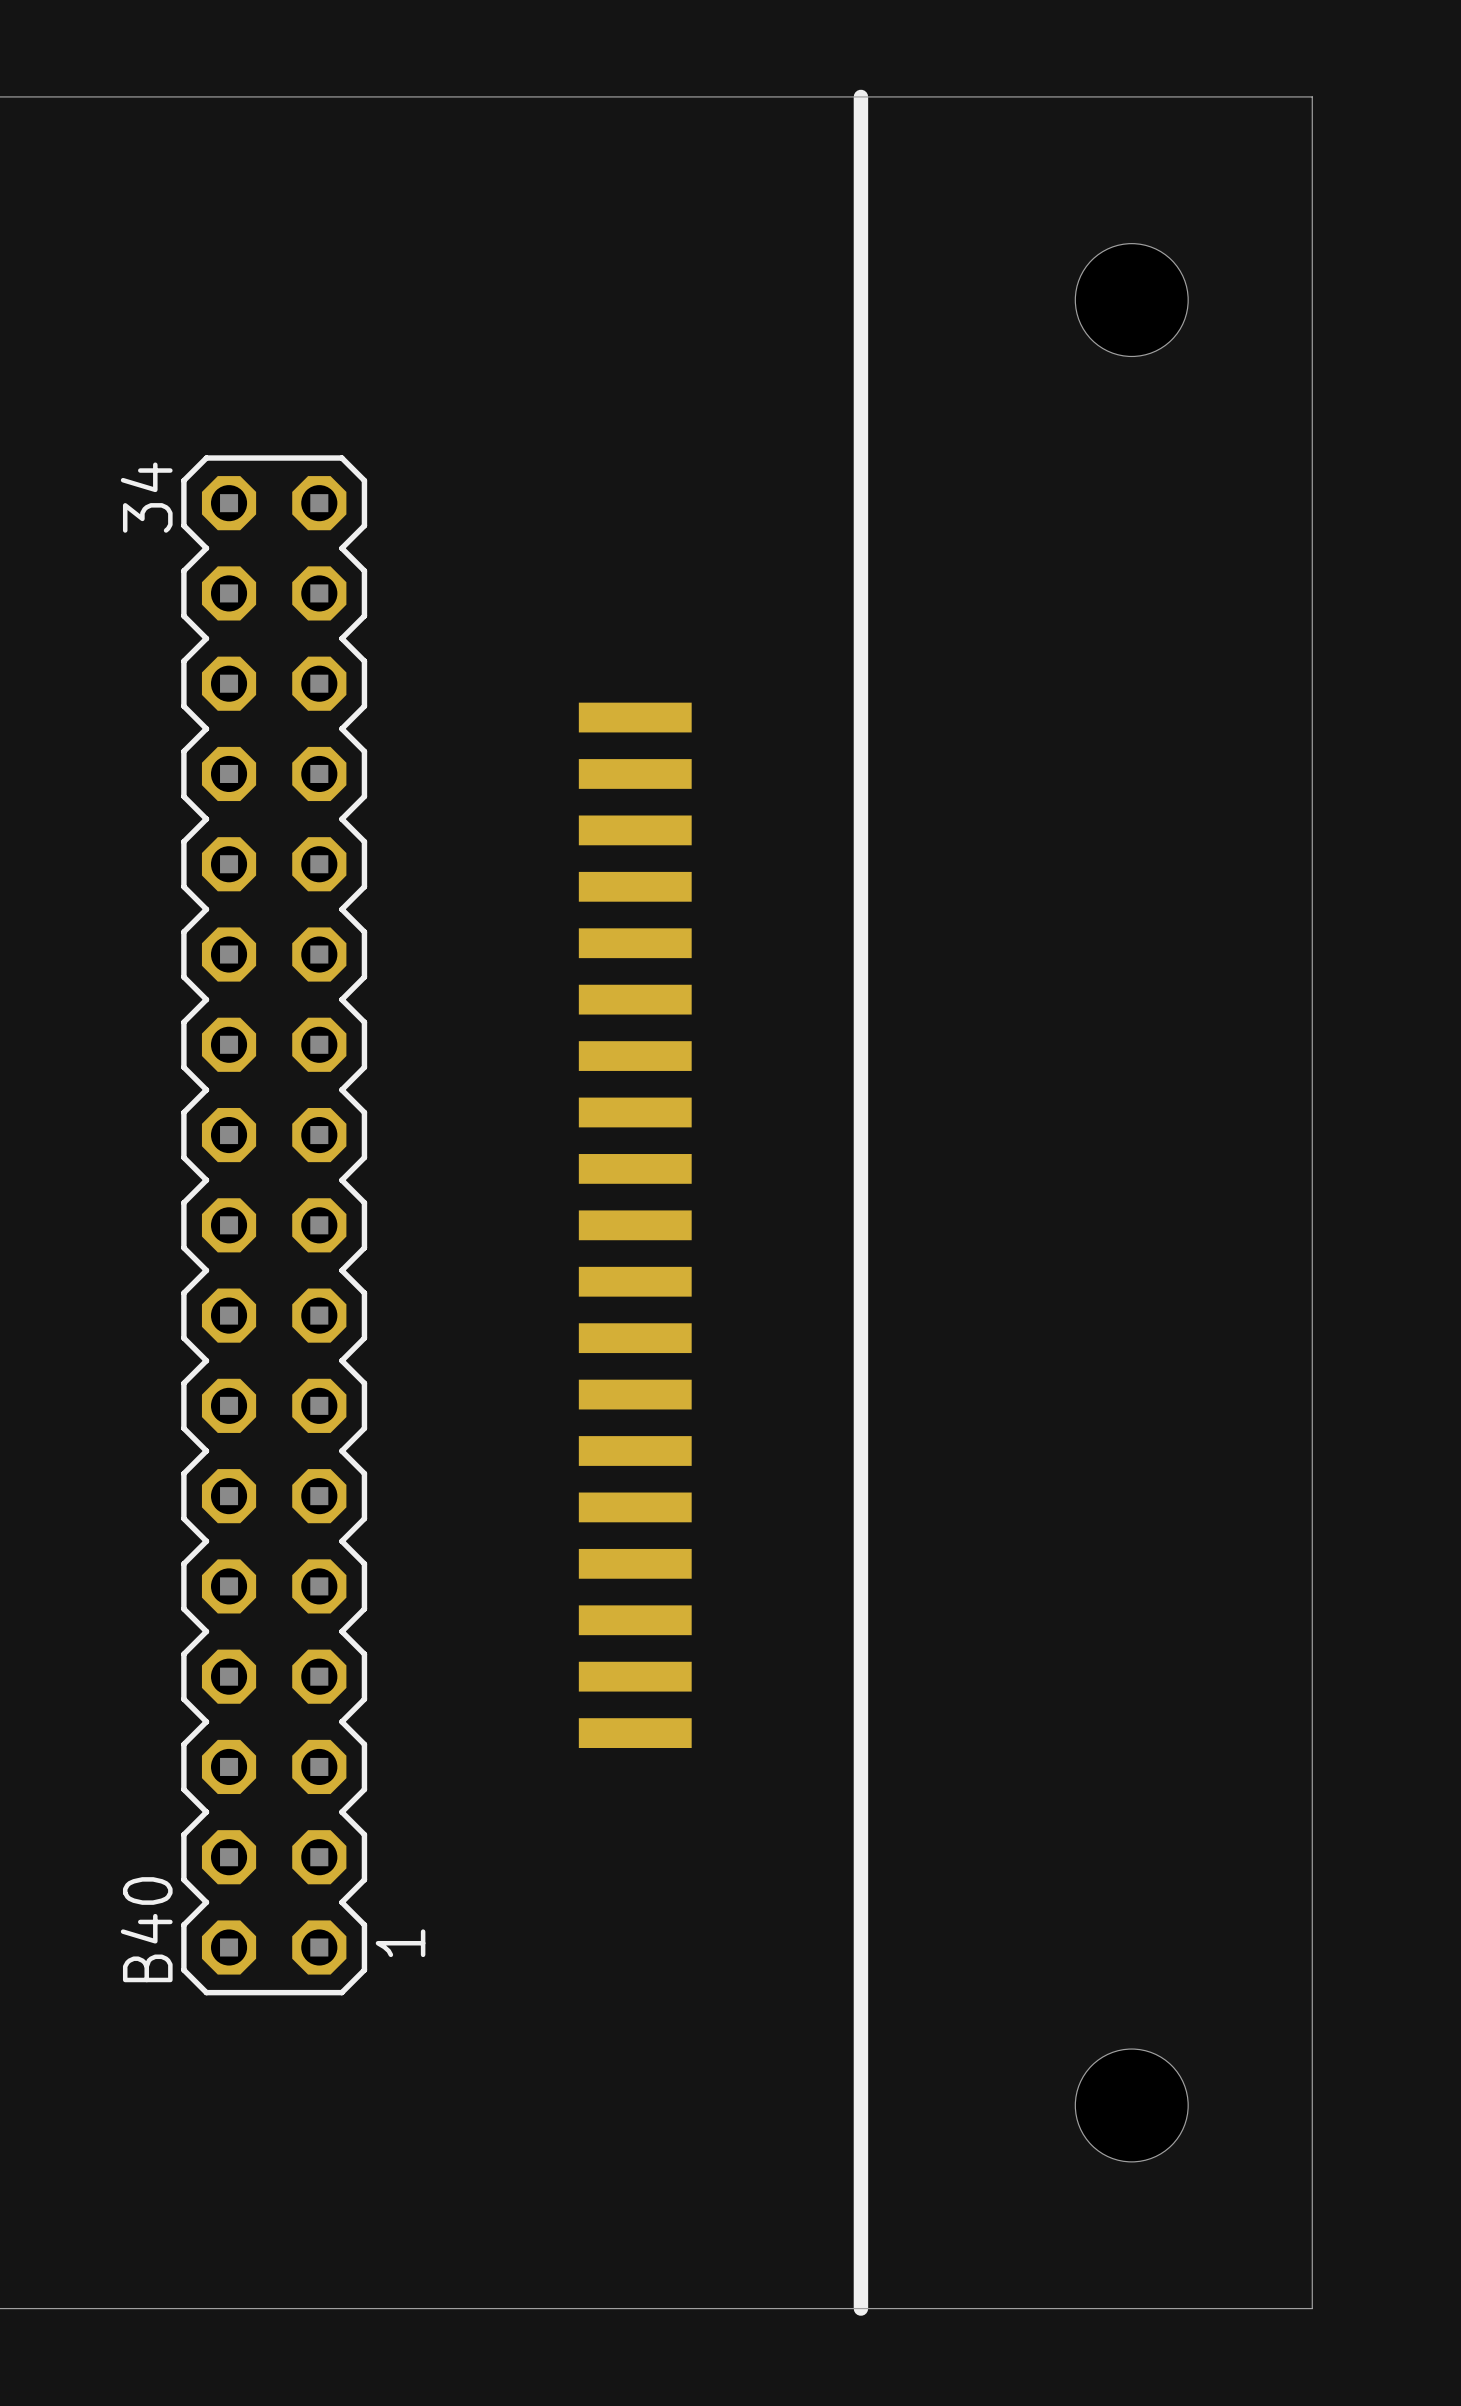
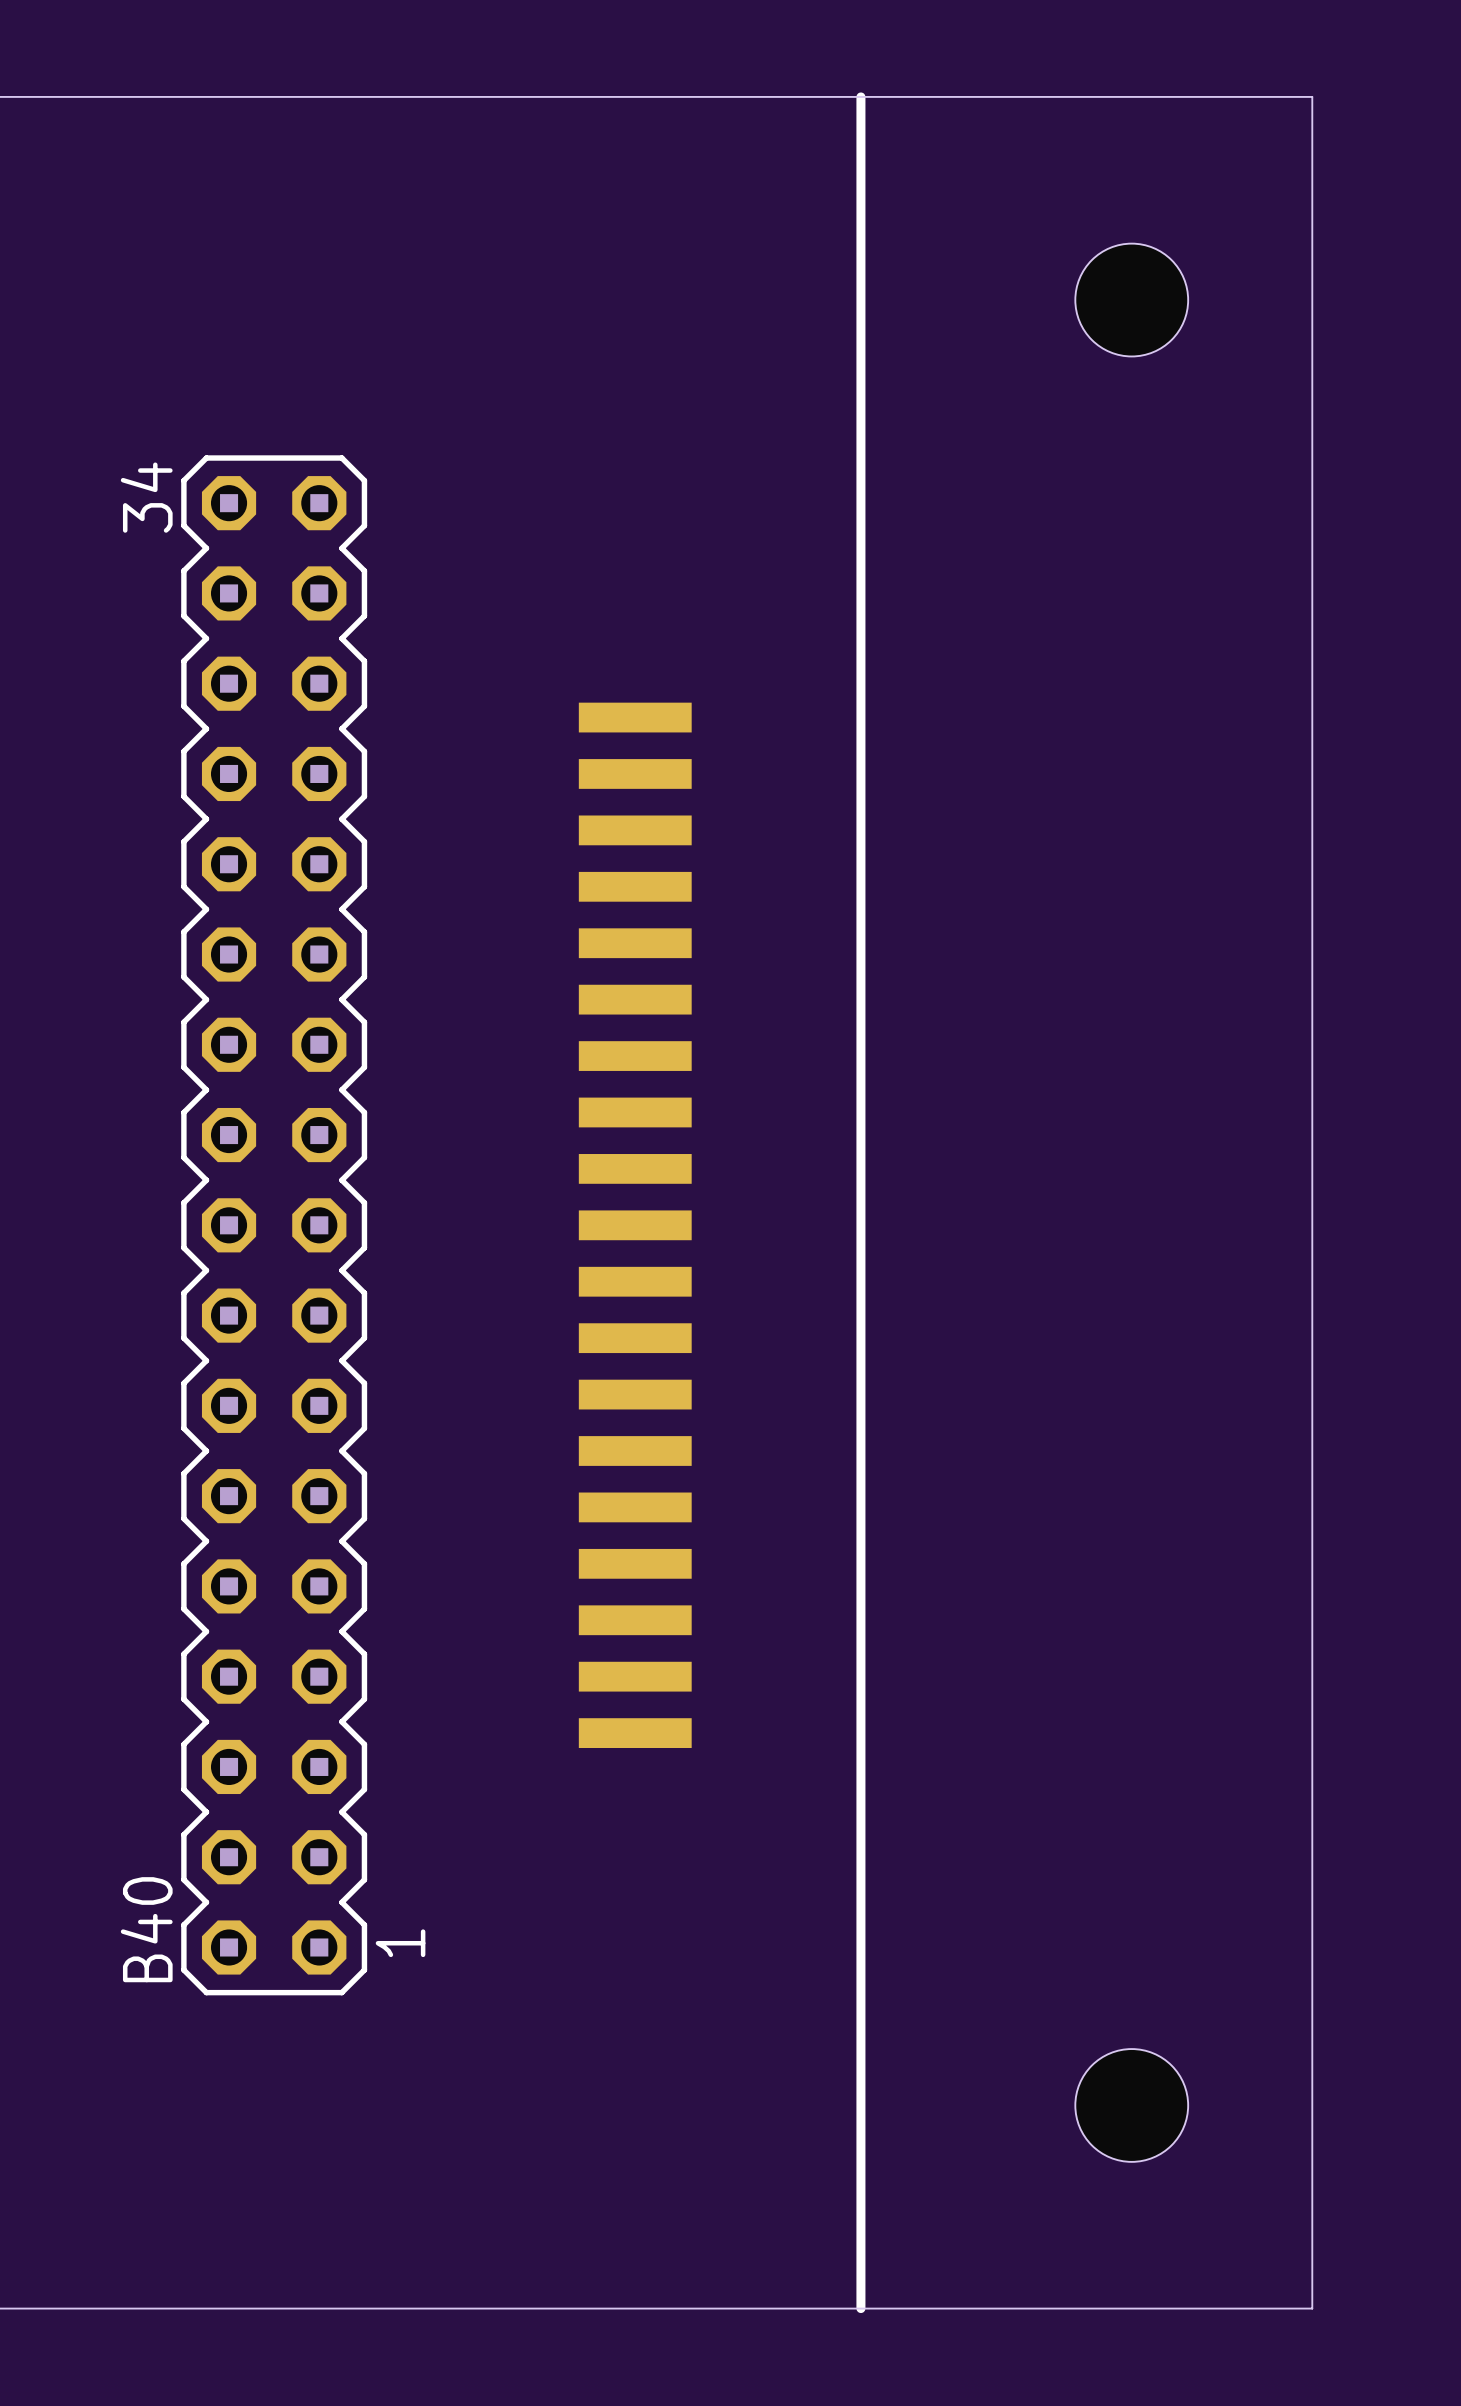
line width: thick (860, 96) (860, 2308) -> thin (860, 96) (860, 2308)

